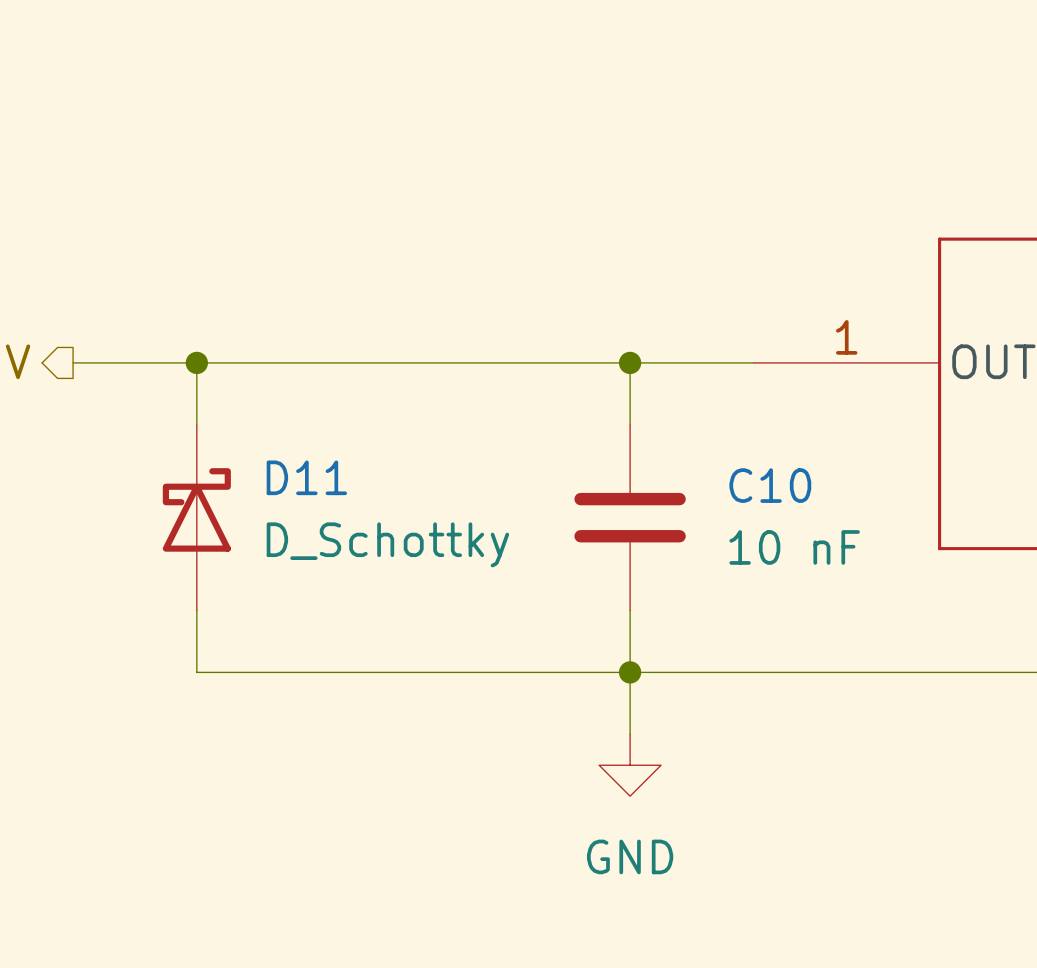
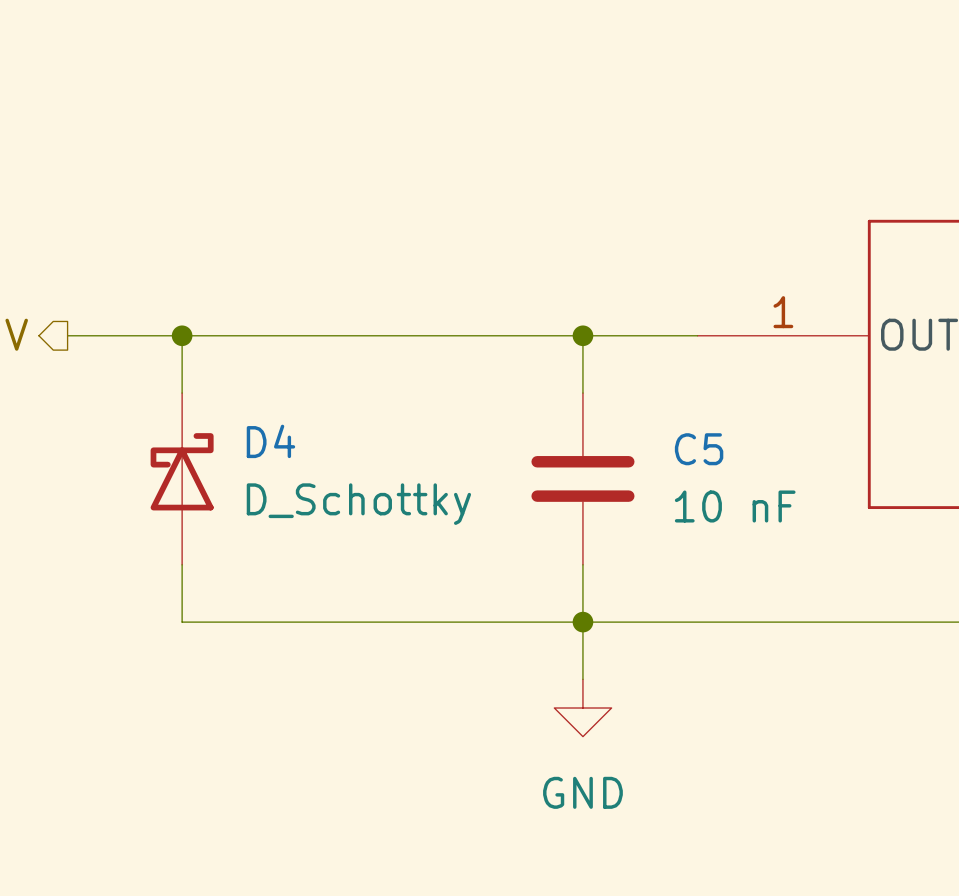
D11 name: D11 (306, 477) -> D4 (270, 441)
C10 name: C10 (770, 485) -> C5 (699, 449)

